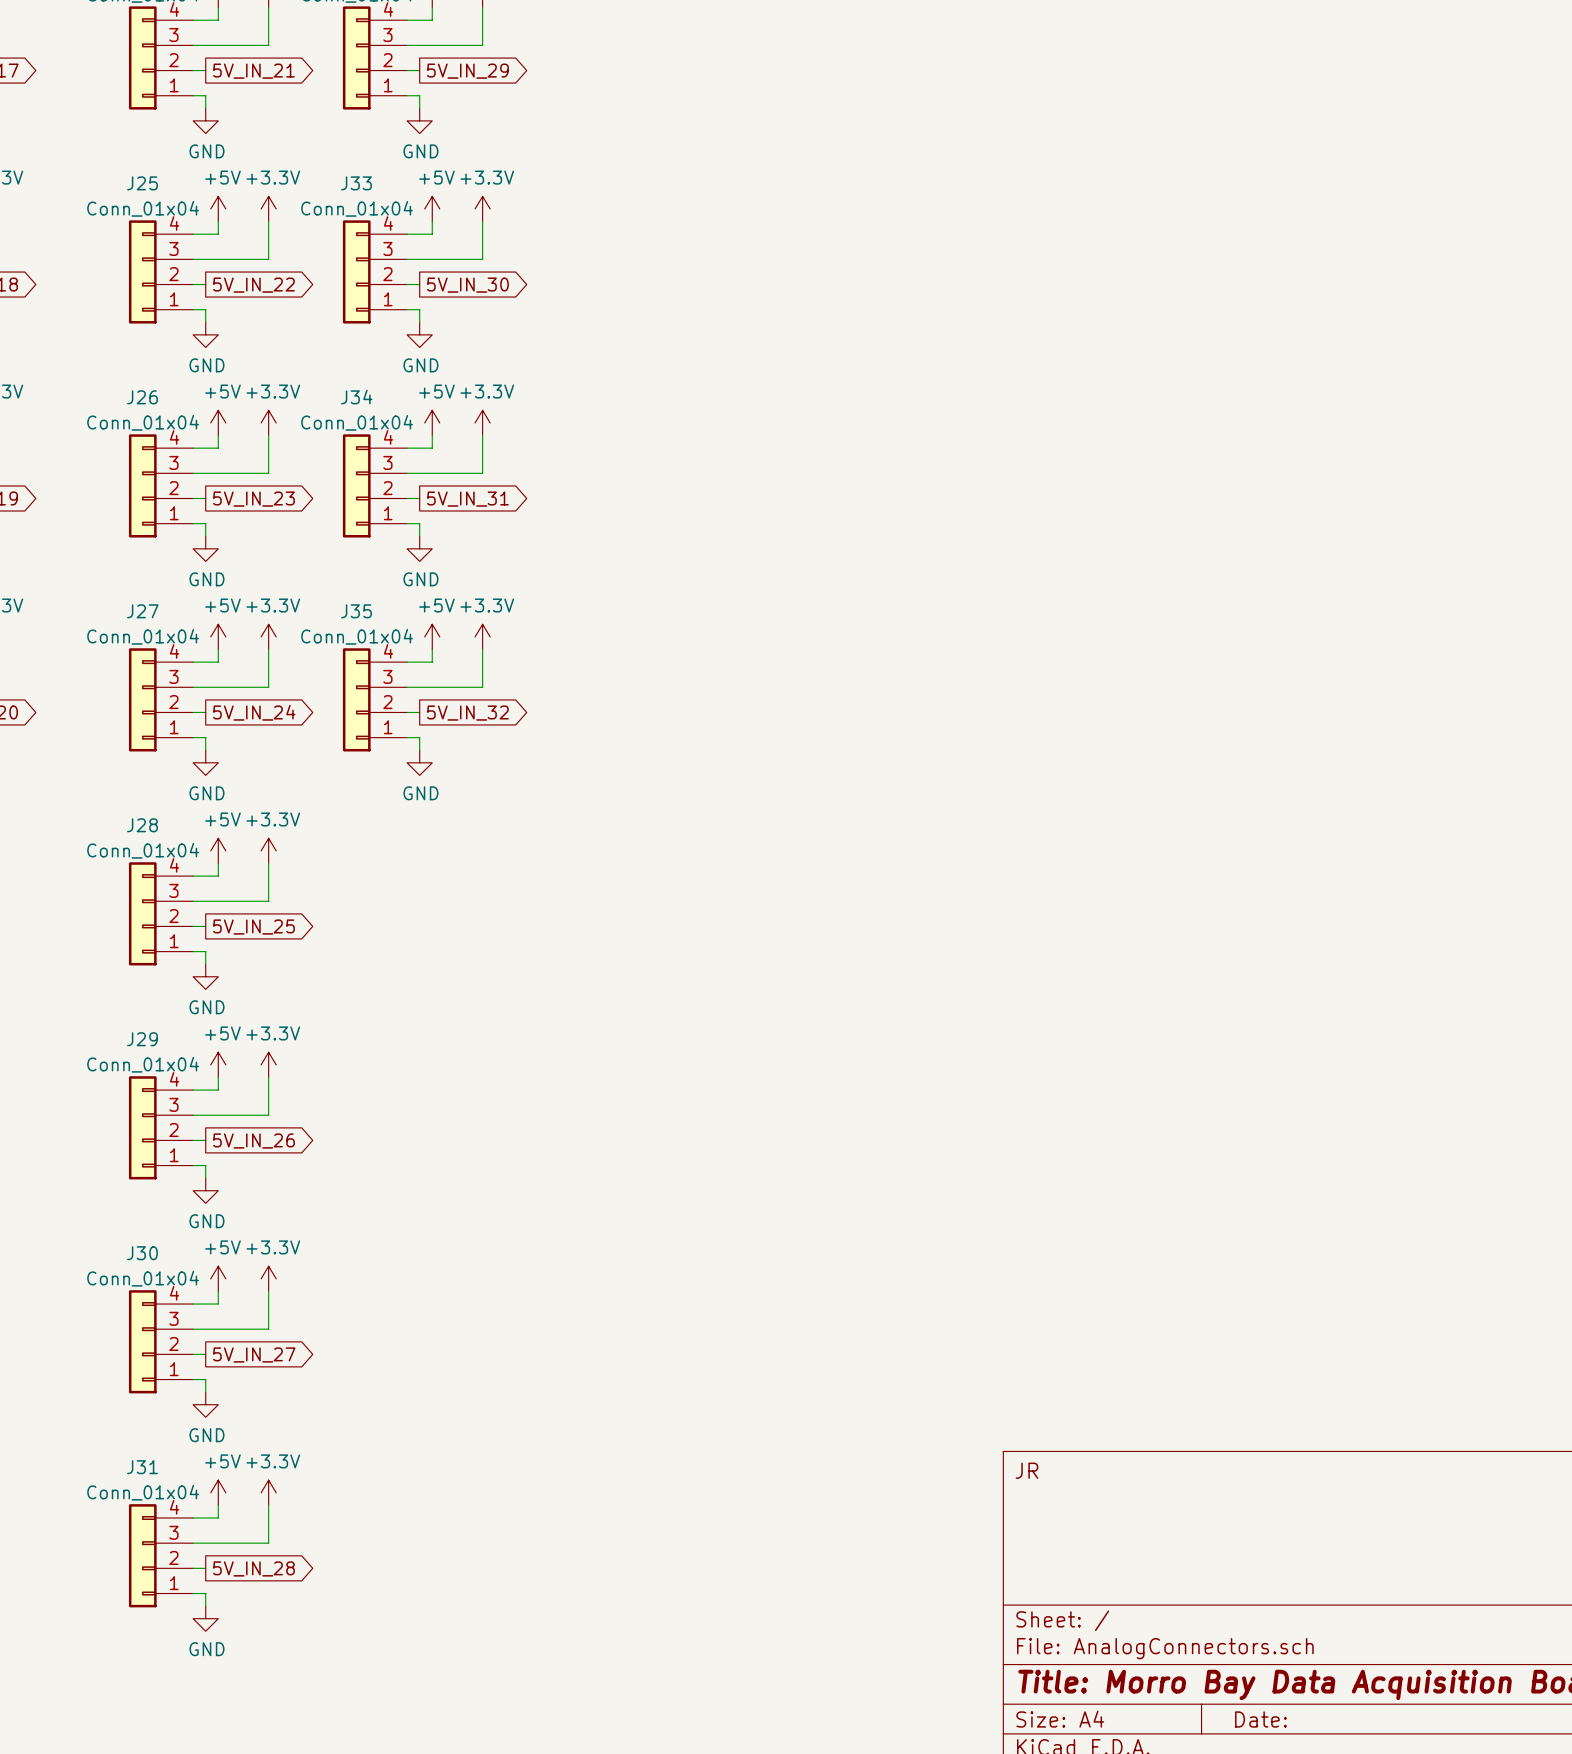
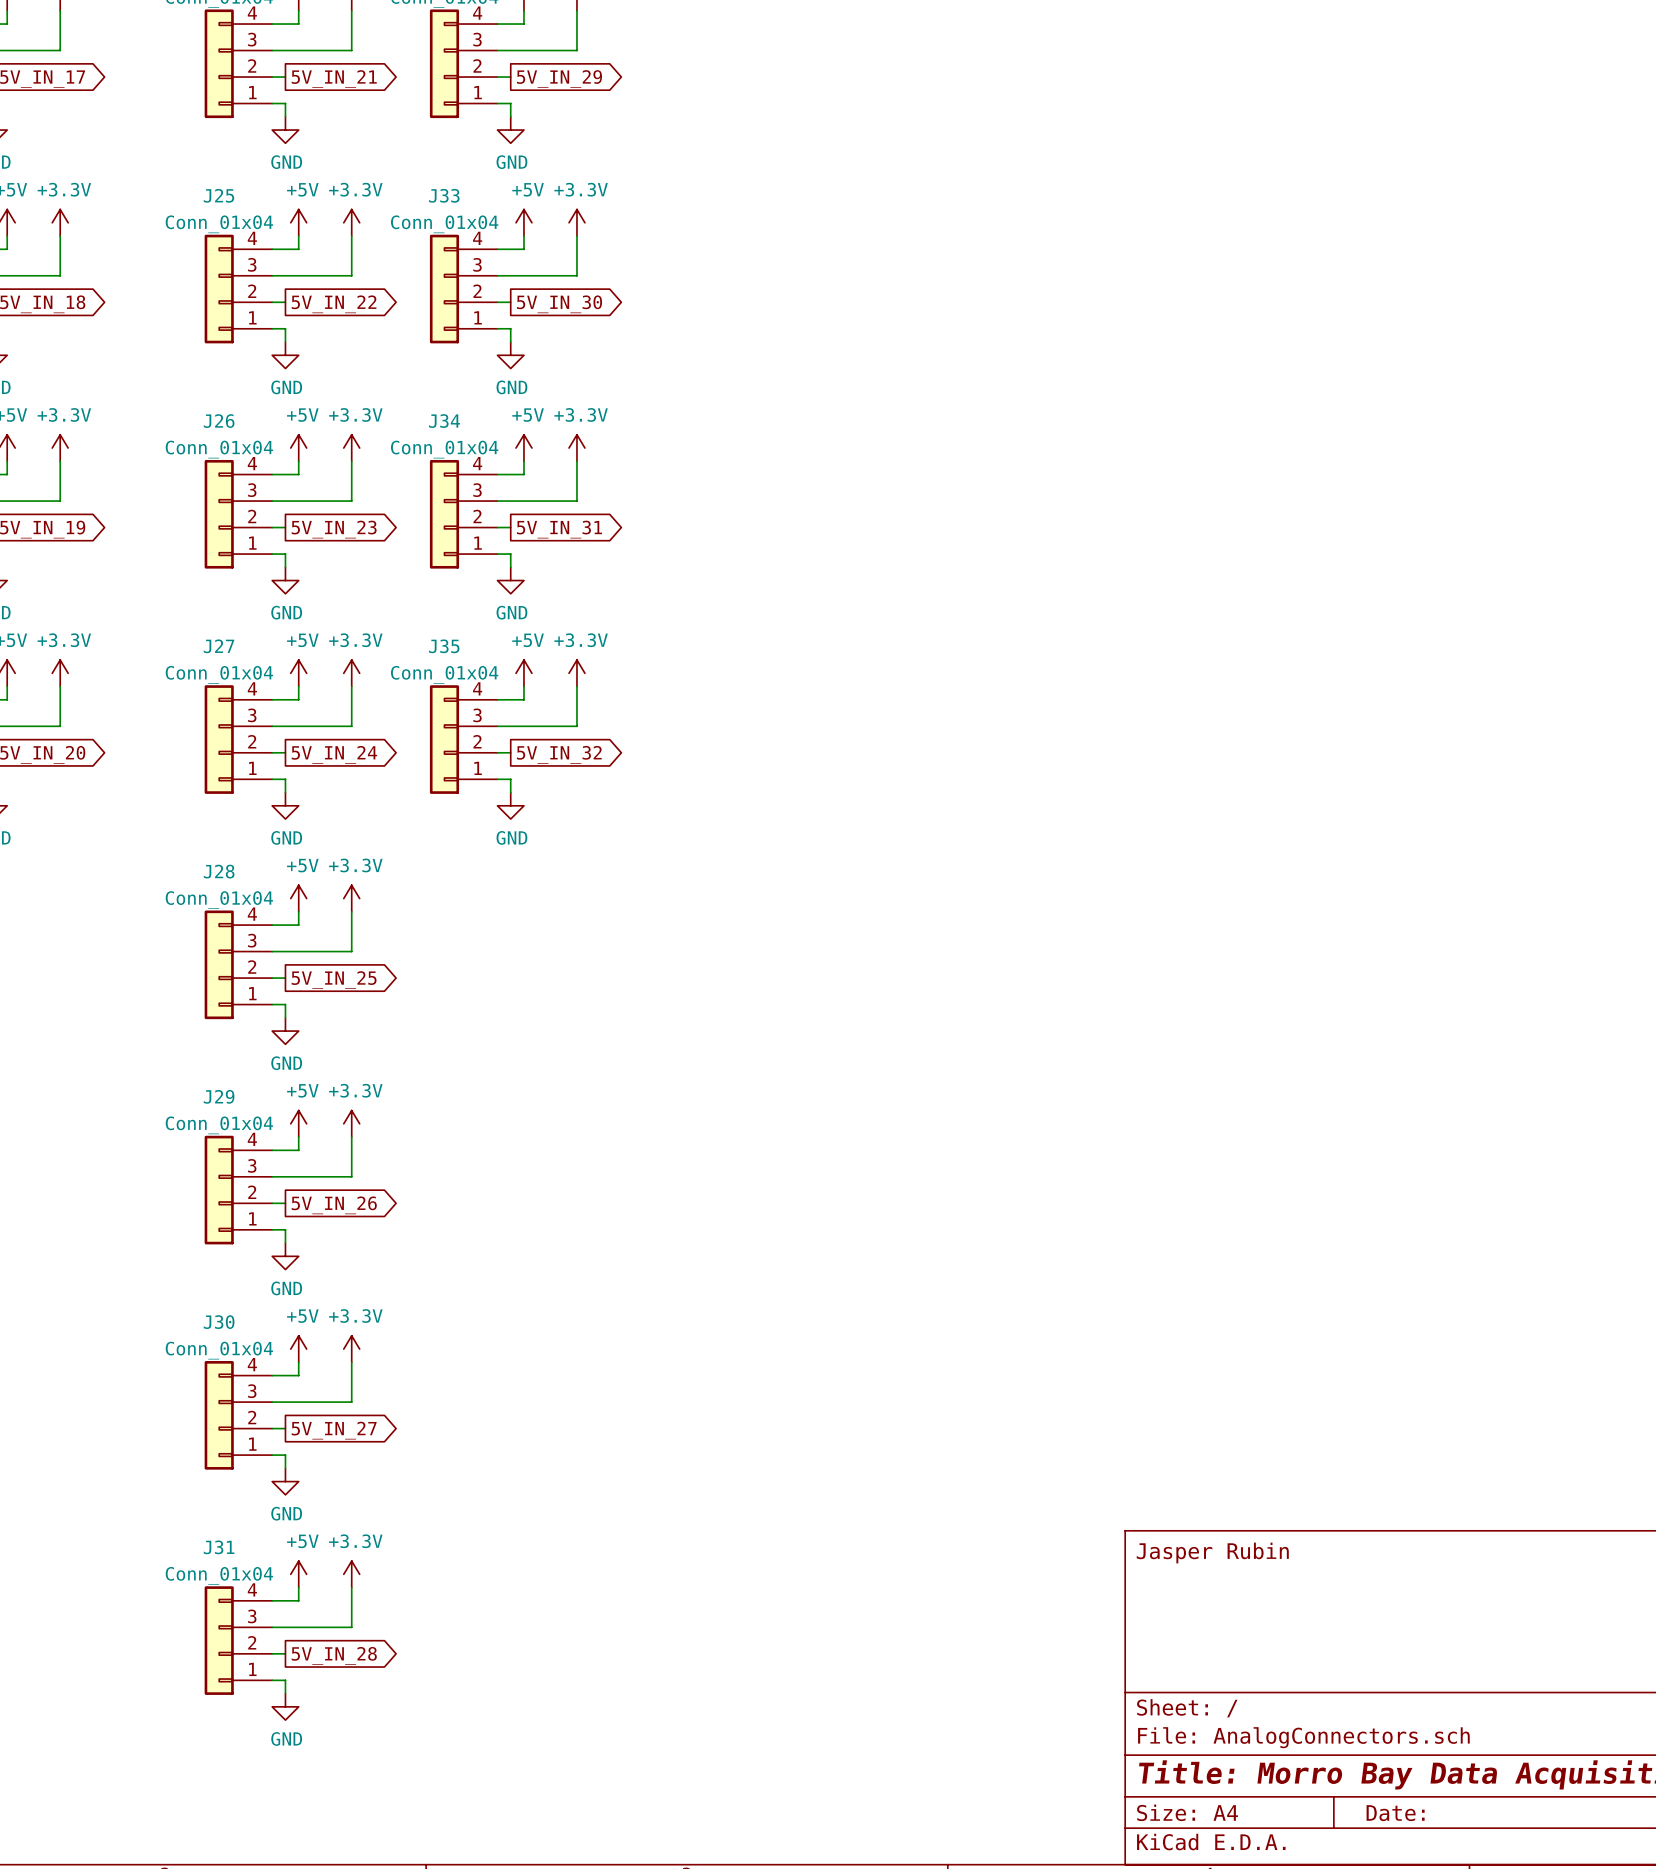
title block: JR (1026, 1470) -> Jasper Rubin (1212, 1552)

